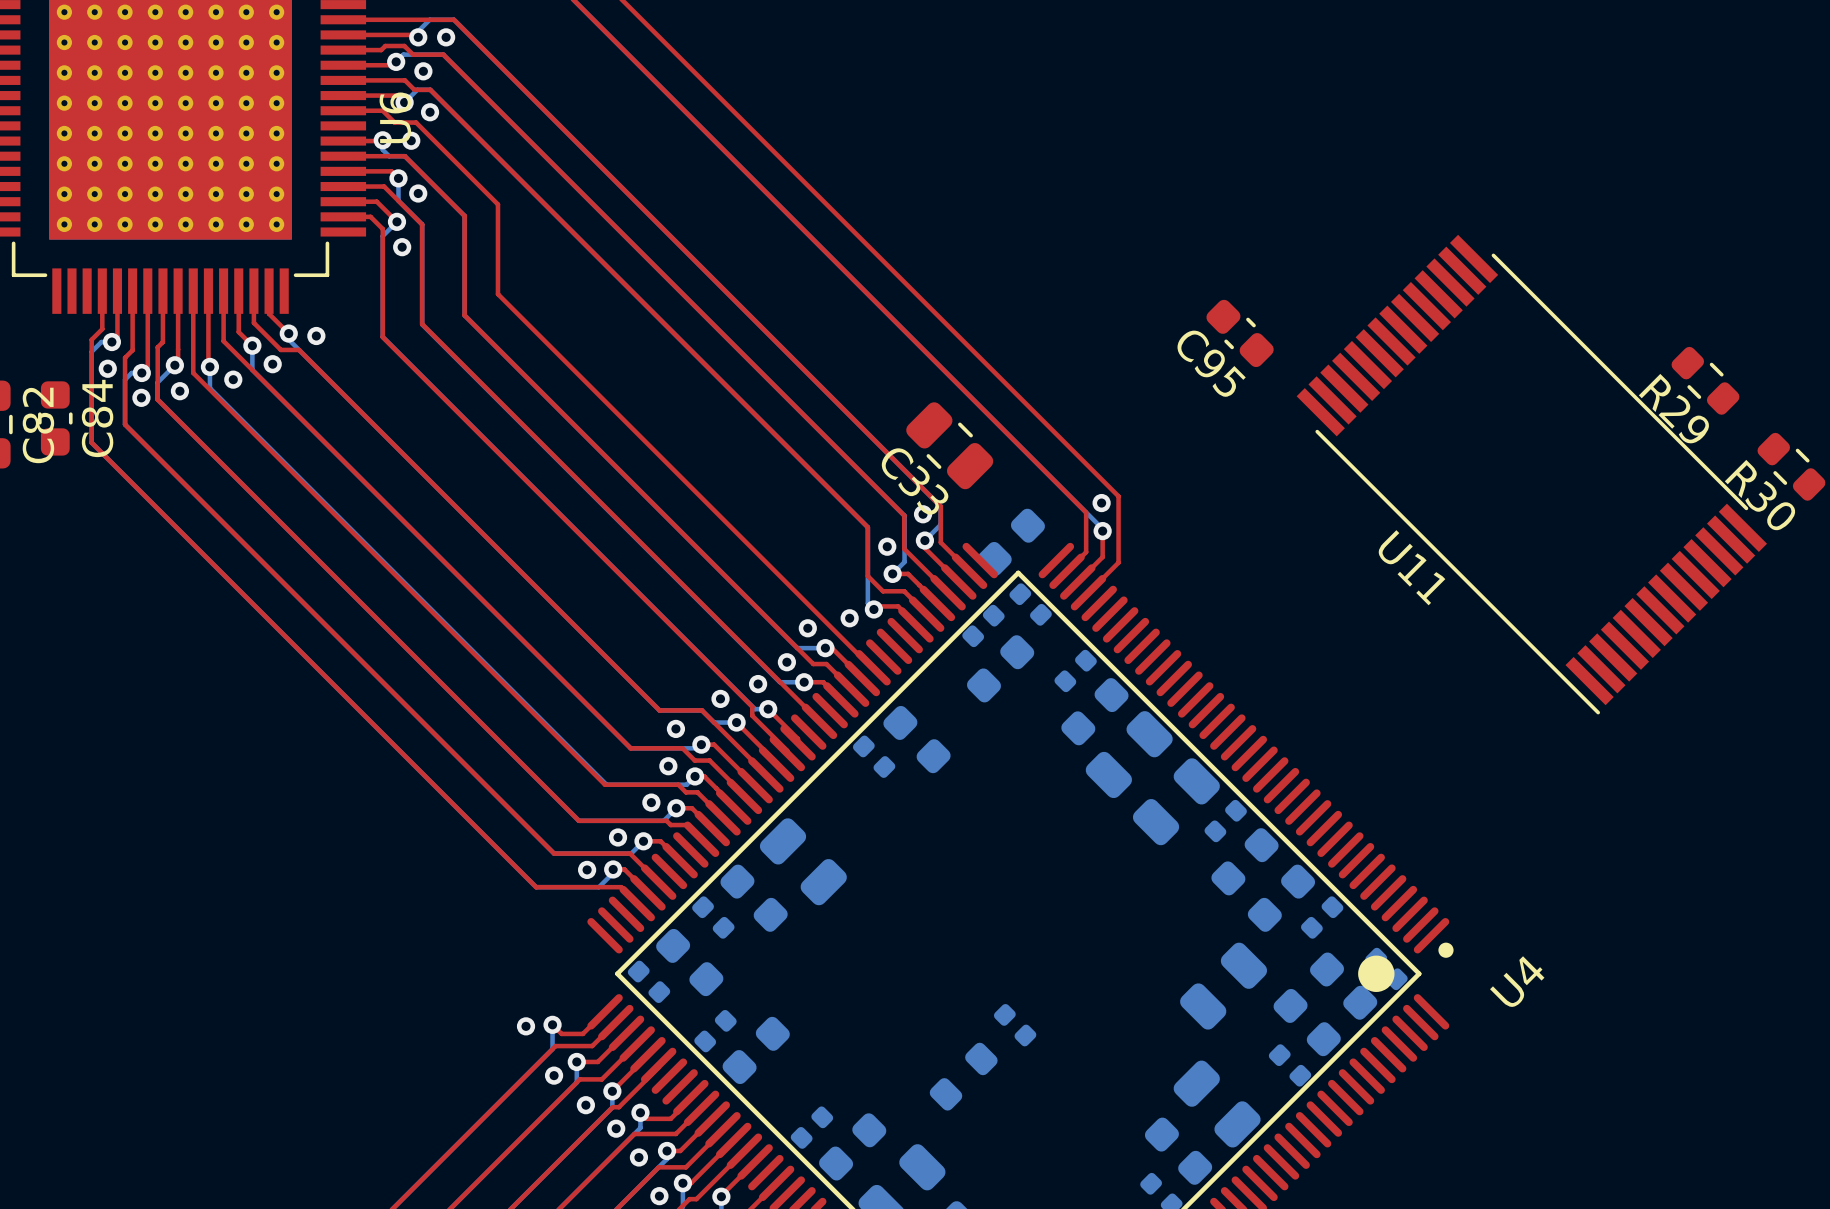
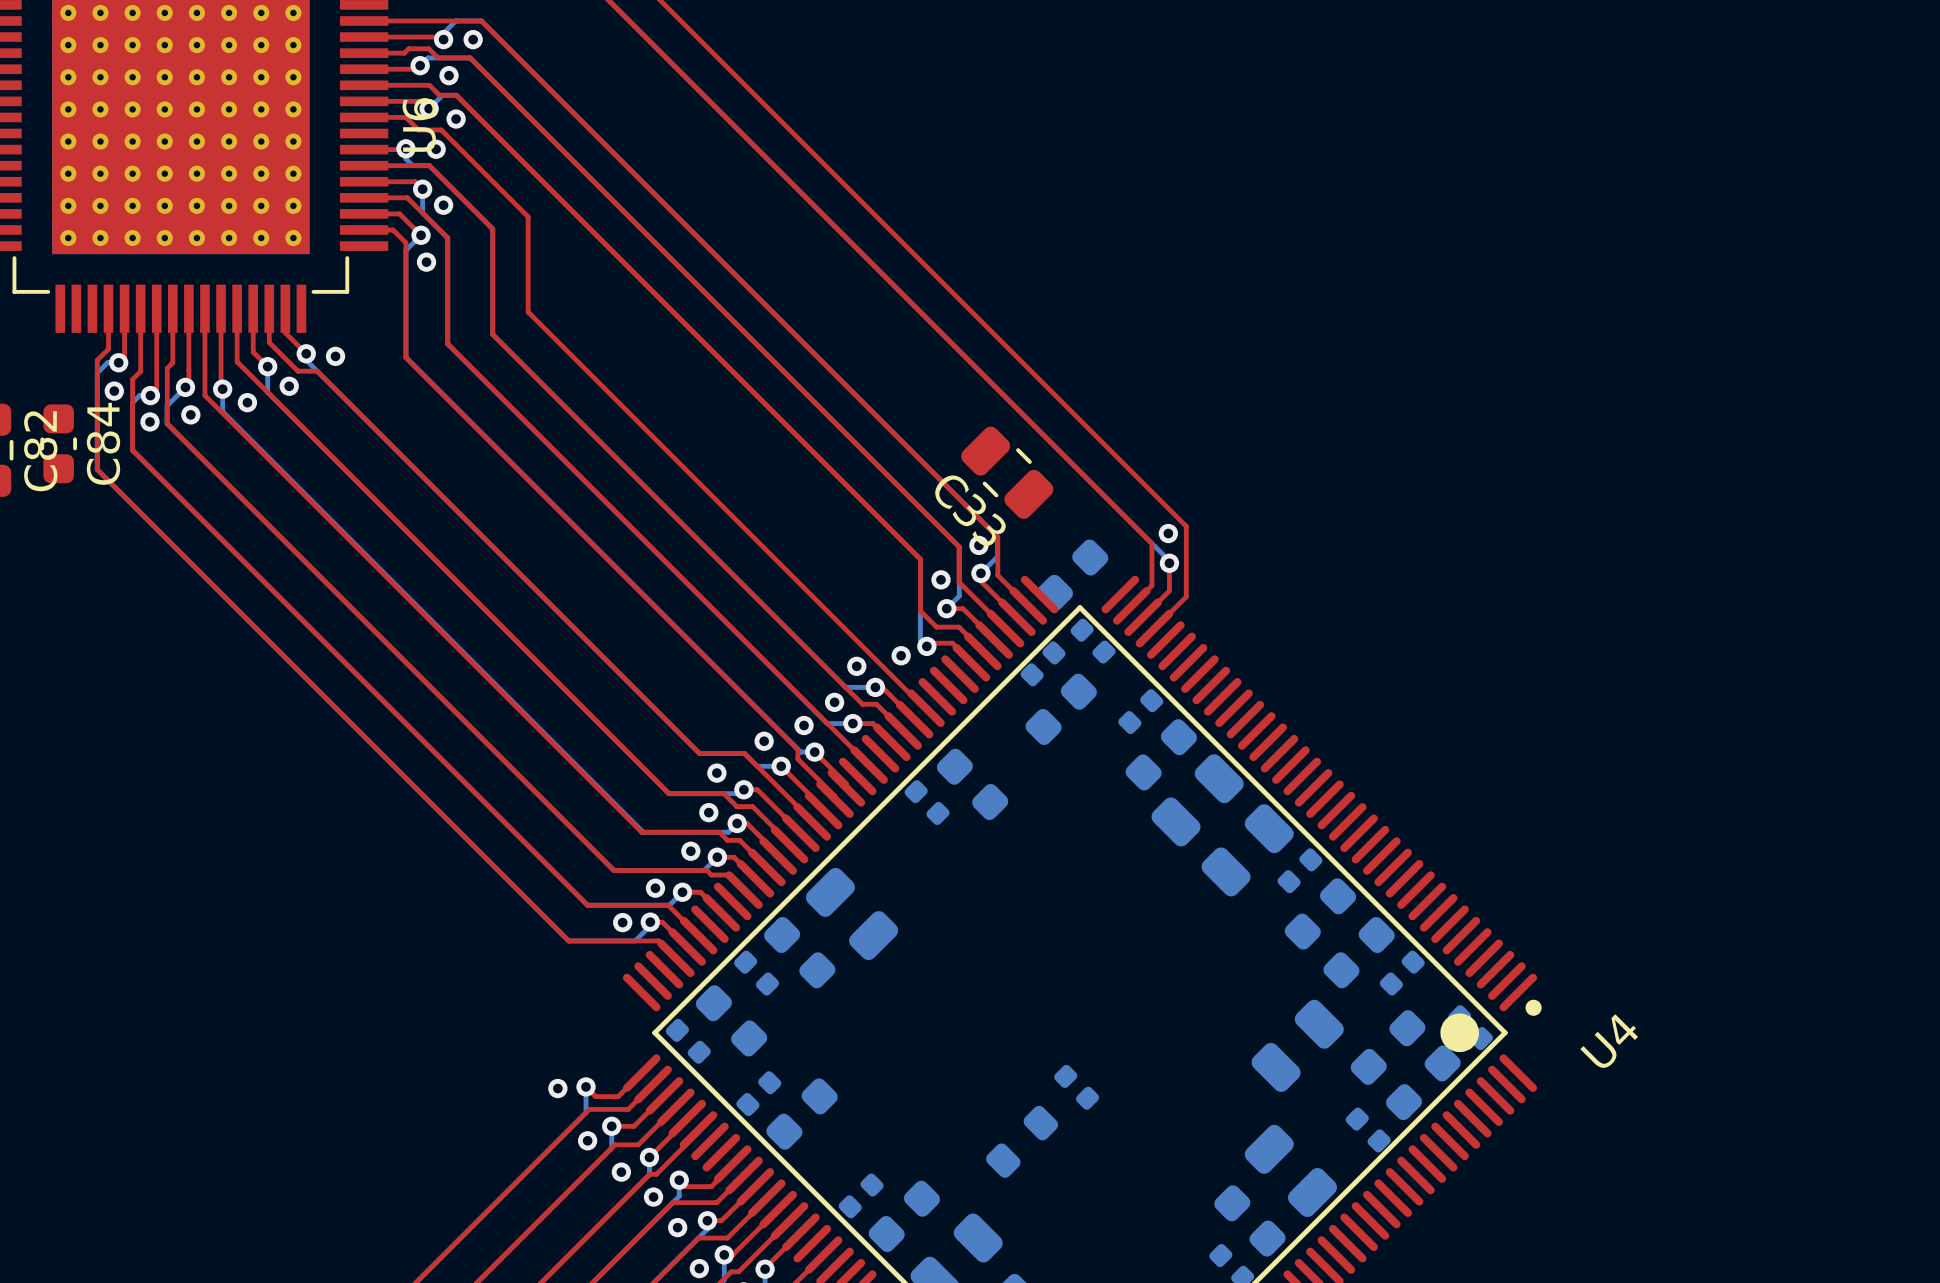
C95: (1240, 333) -> none
R29: (1705, 380) -> none
R30: (1791, 466) -> none
U11: (1531, 474) -> none

